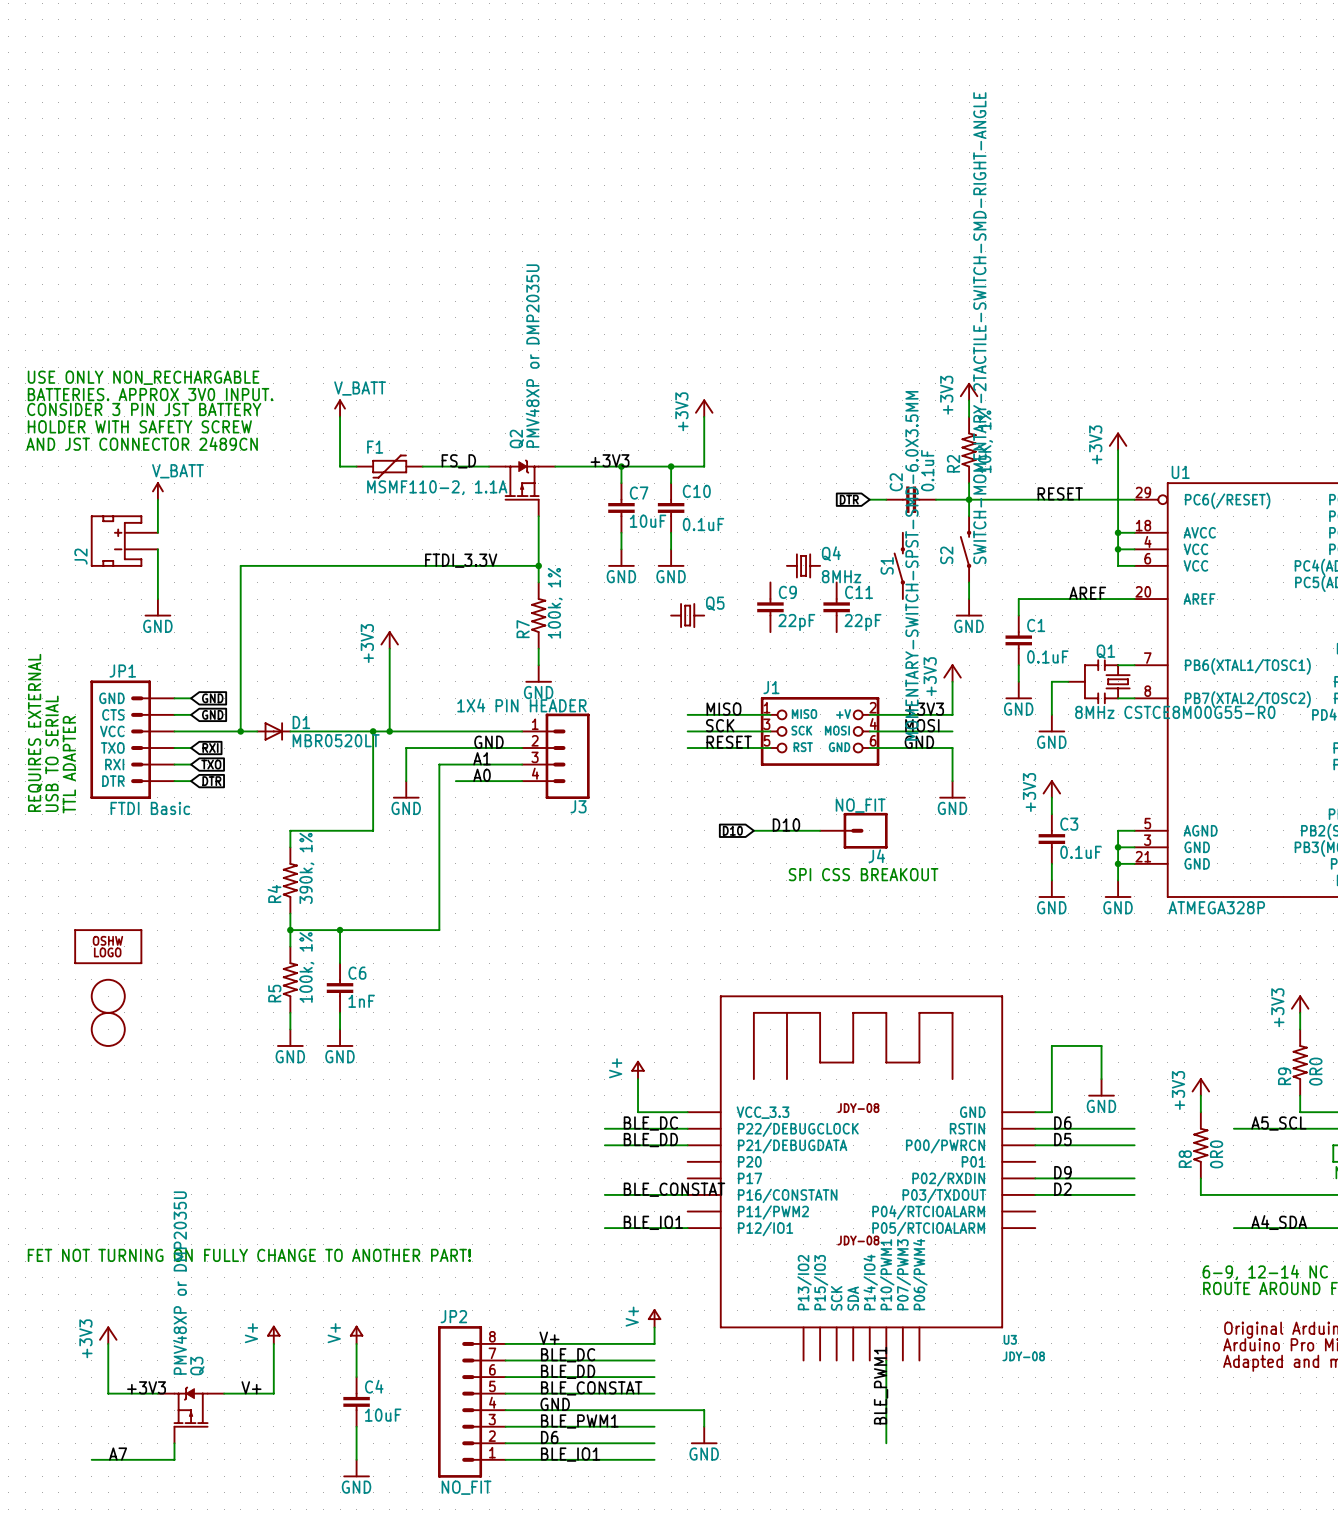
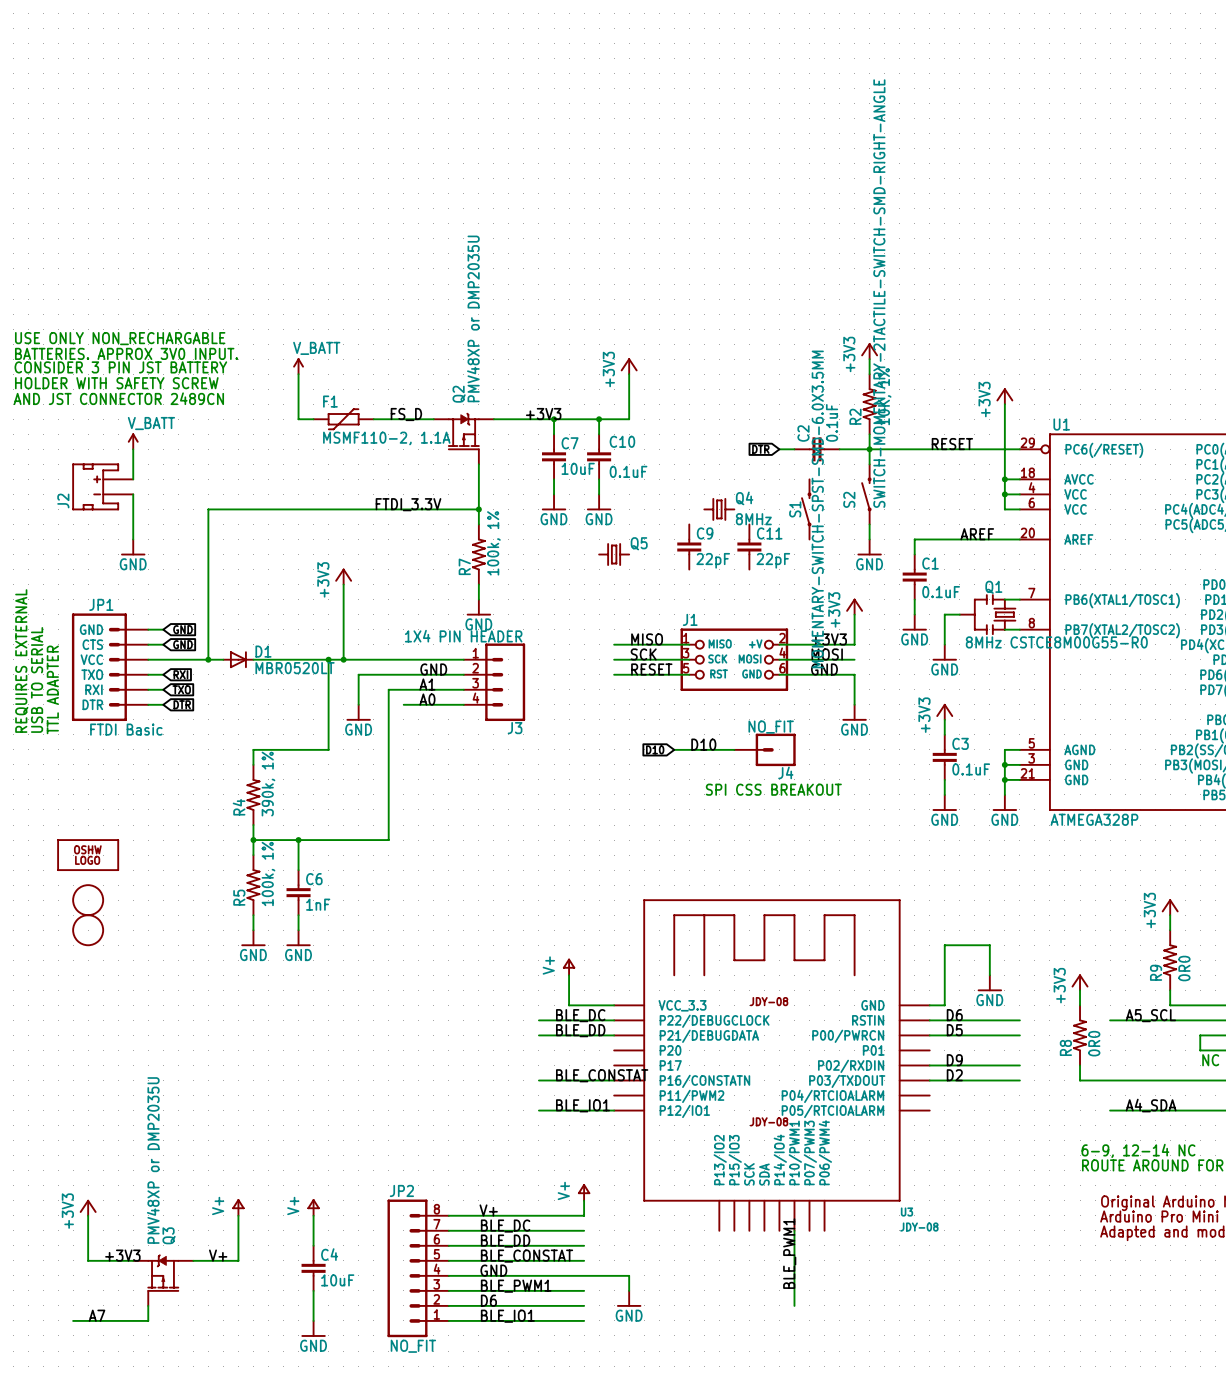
text: FET NOT TURNING ON FULLY CHANGE TO ANOTHER PART! (249, 1255) -> none

